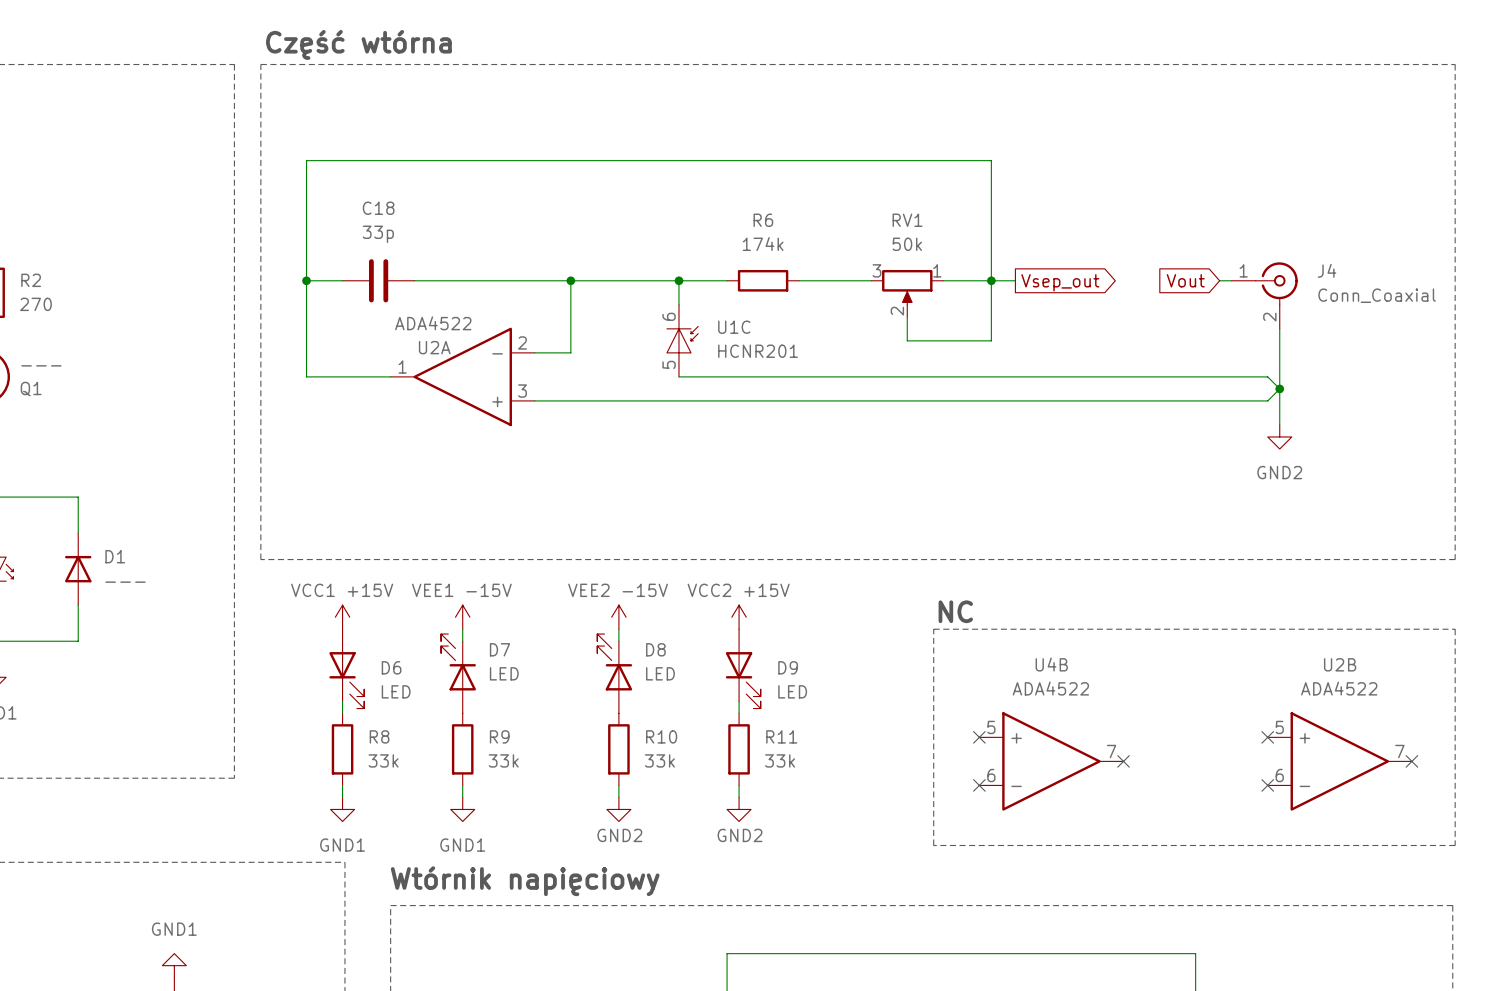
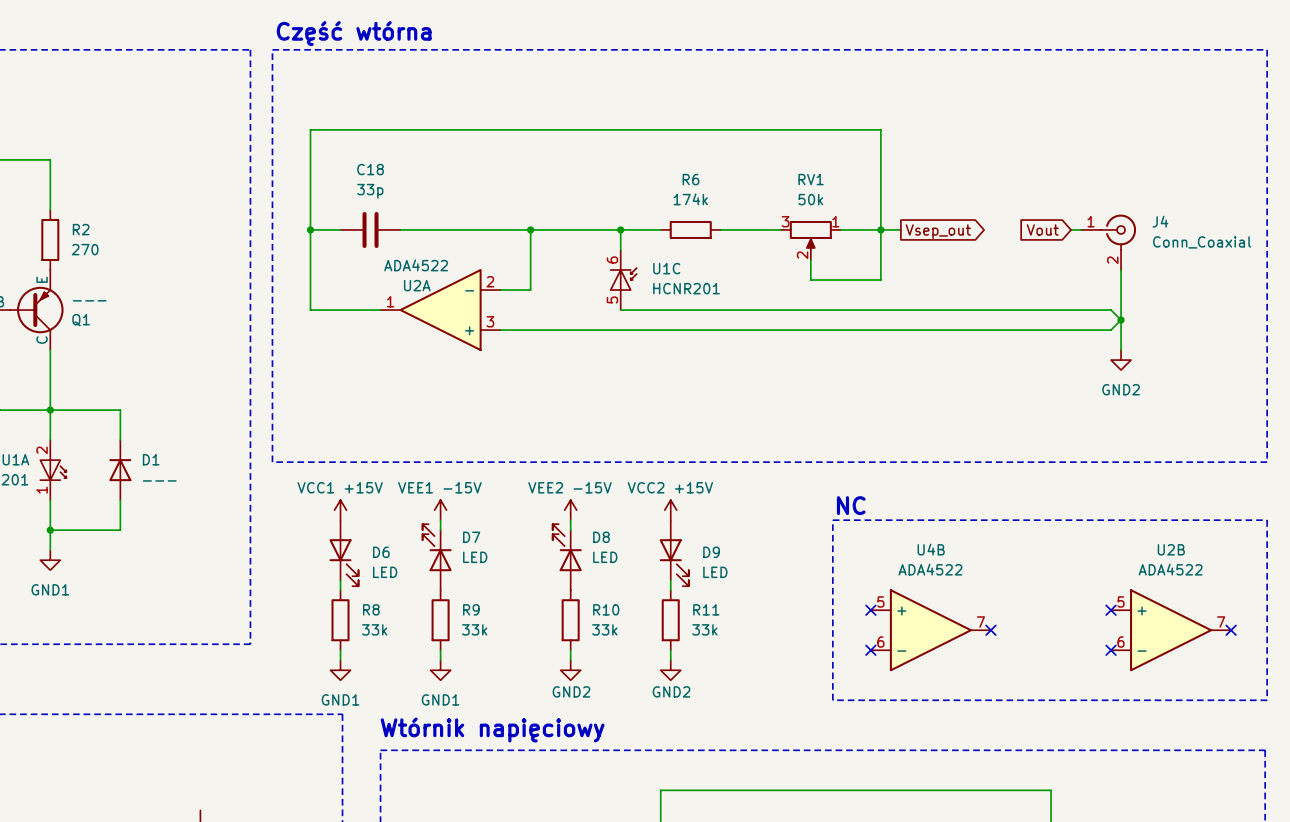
power symbol: GND1 (174, 965) -> none

